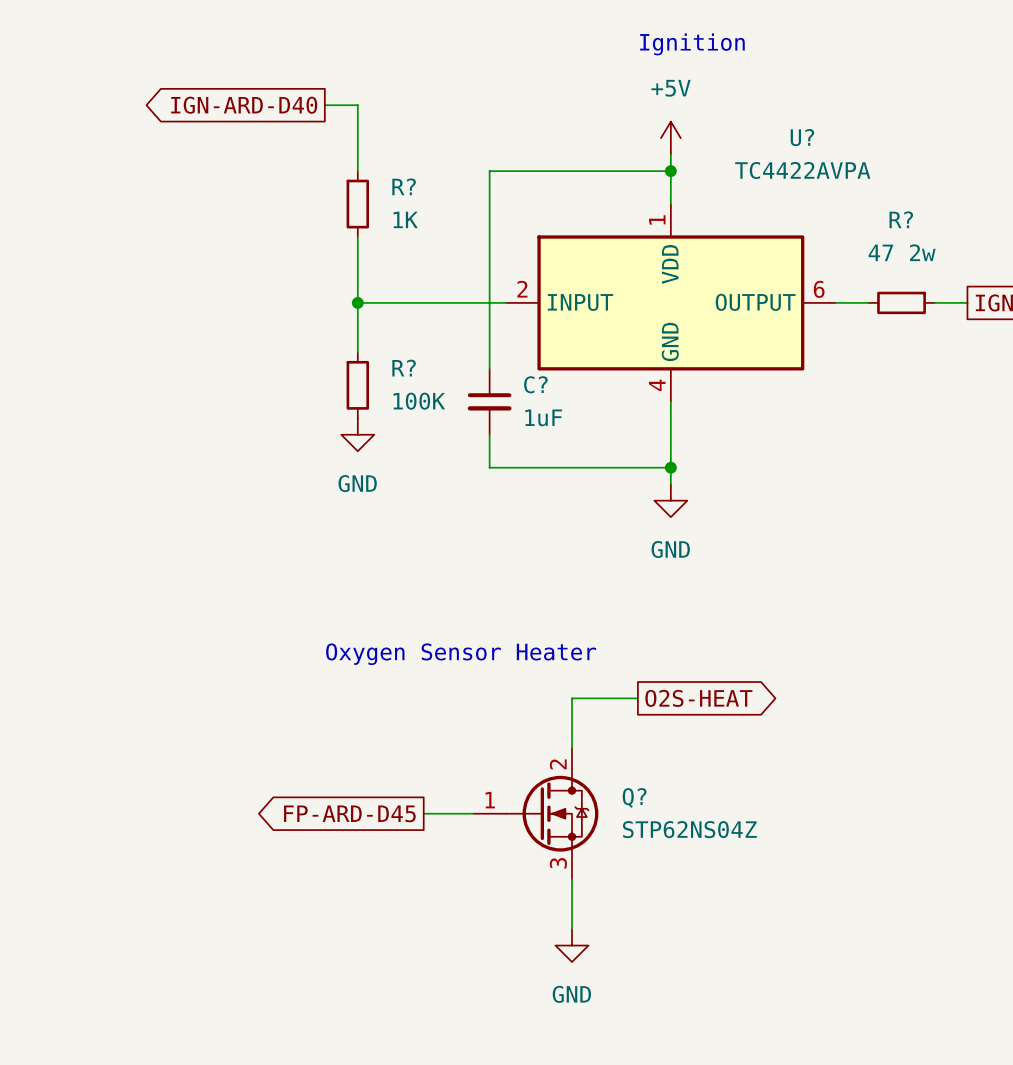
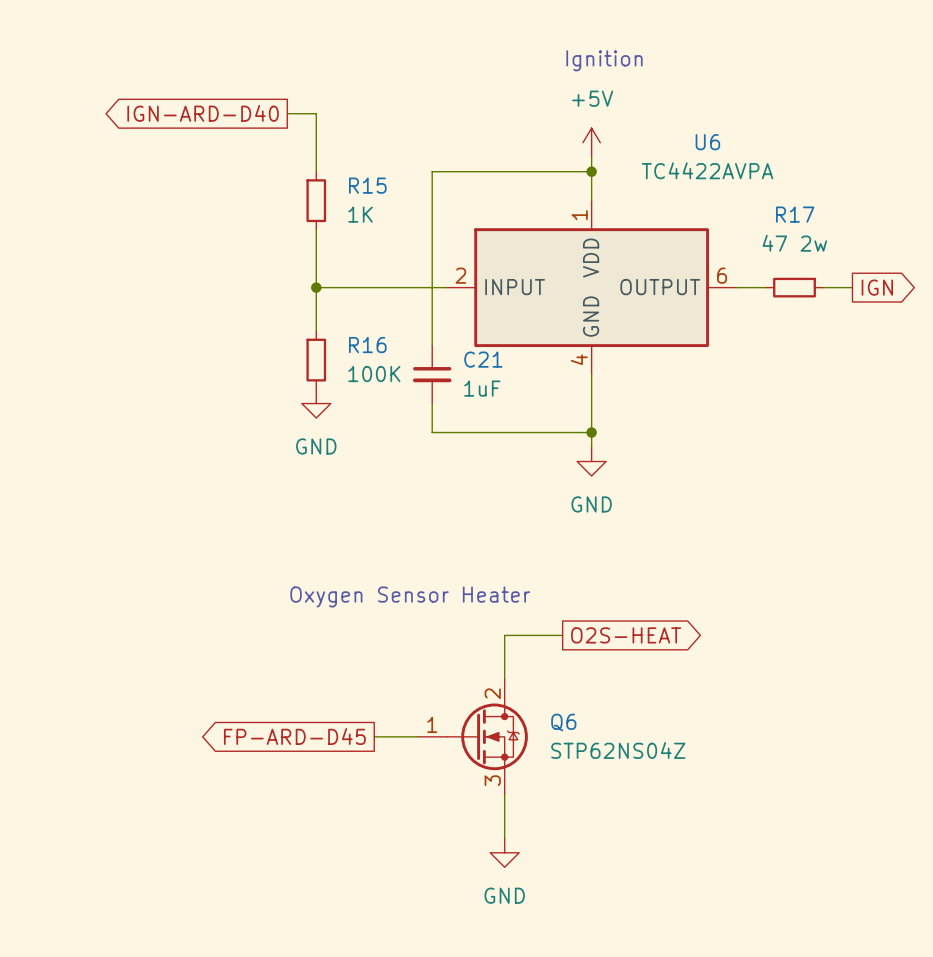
U? name: U? (802, 137) -> U6 (707, 142)
R? name: R? (404, 186) -> R15 (367, 185)
R? name: R? (901, 219) -> R17 (795, 214)
R? name: R? (404, 368) -> R16 (367, 345)
C? name: C? (535, 384) -> C21 (483, 359)
Q? name: Q? (634, 797) -> Q6 (563, 722)

